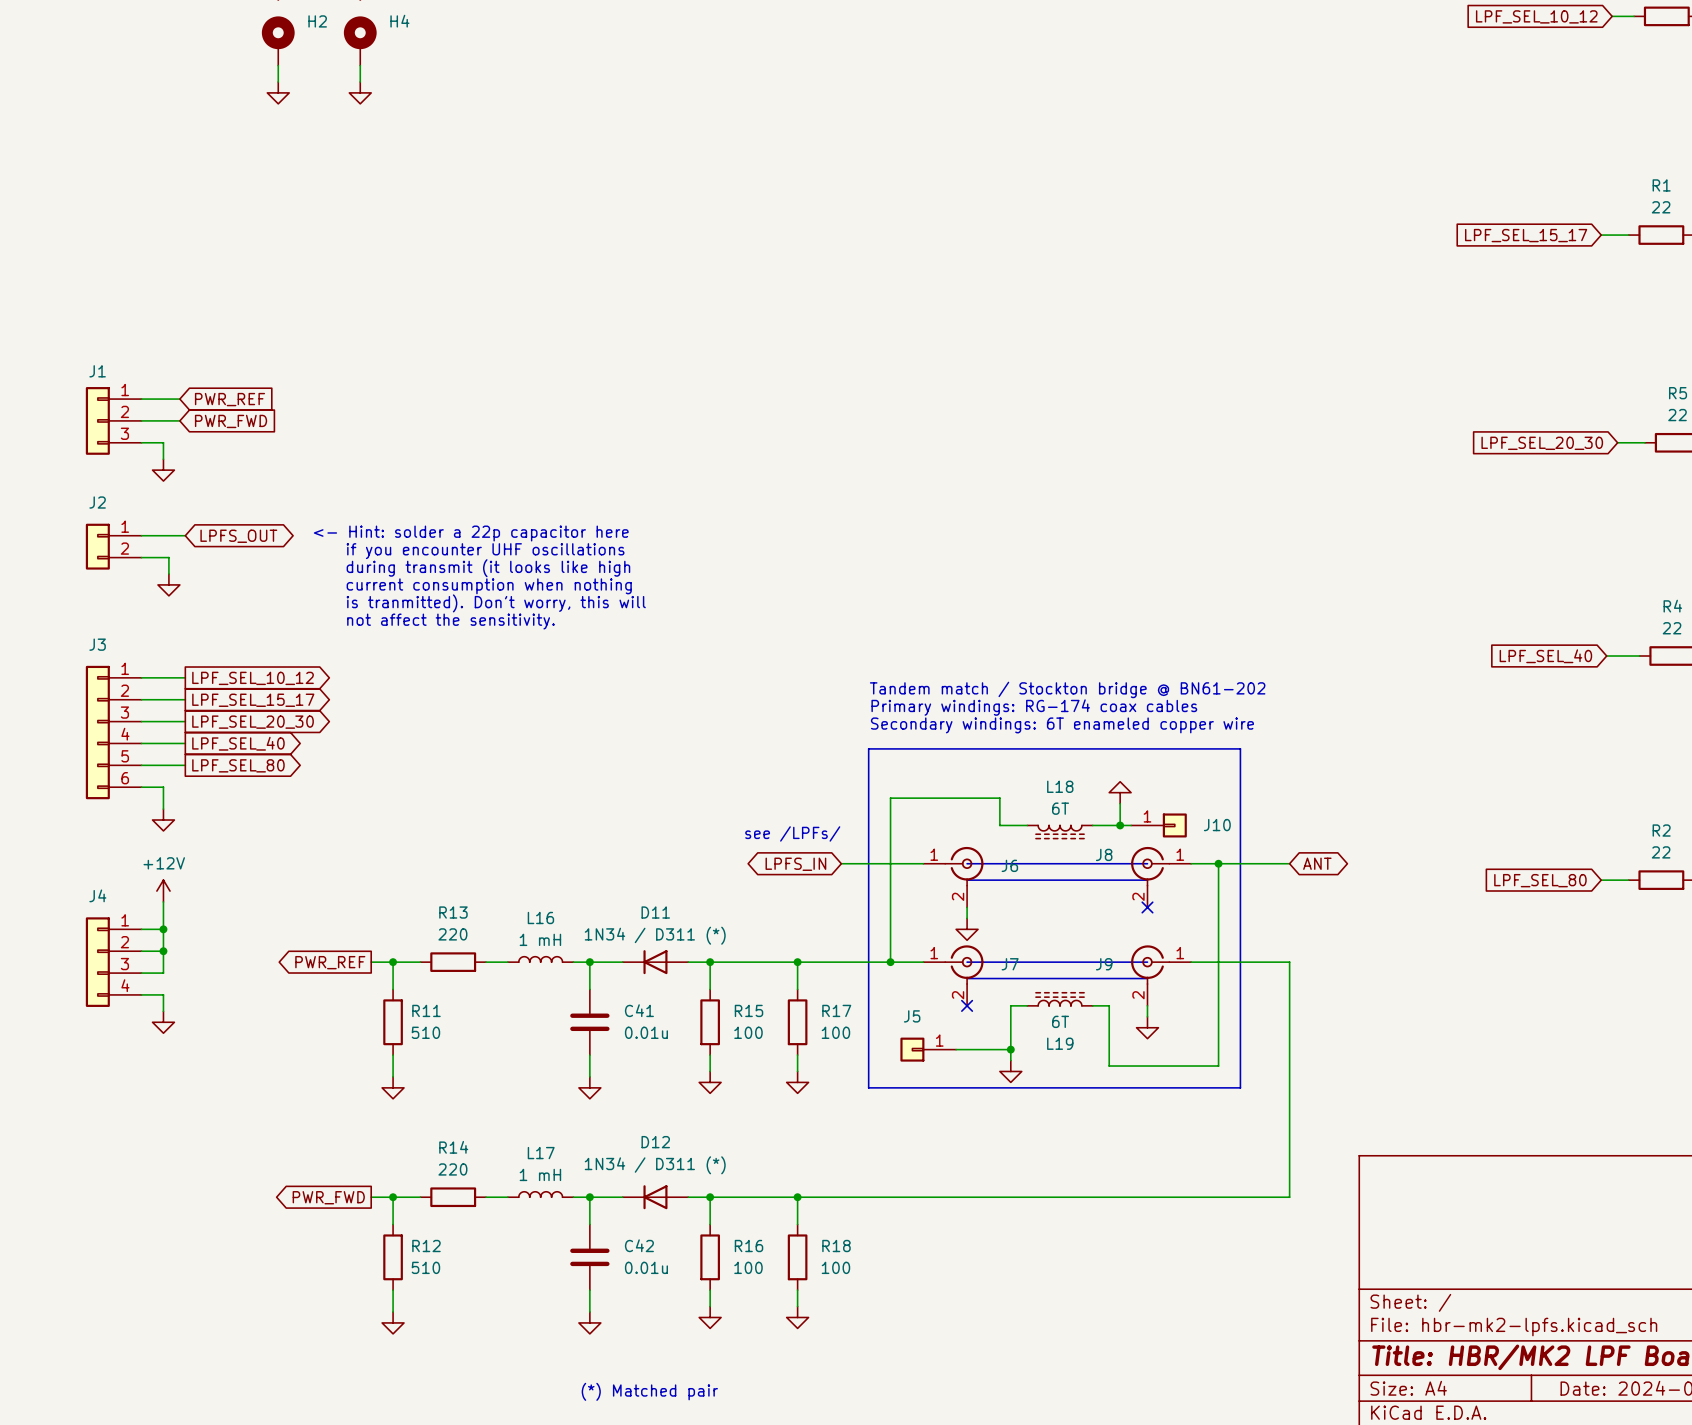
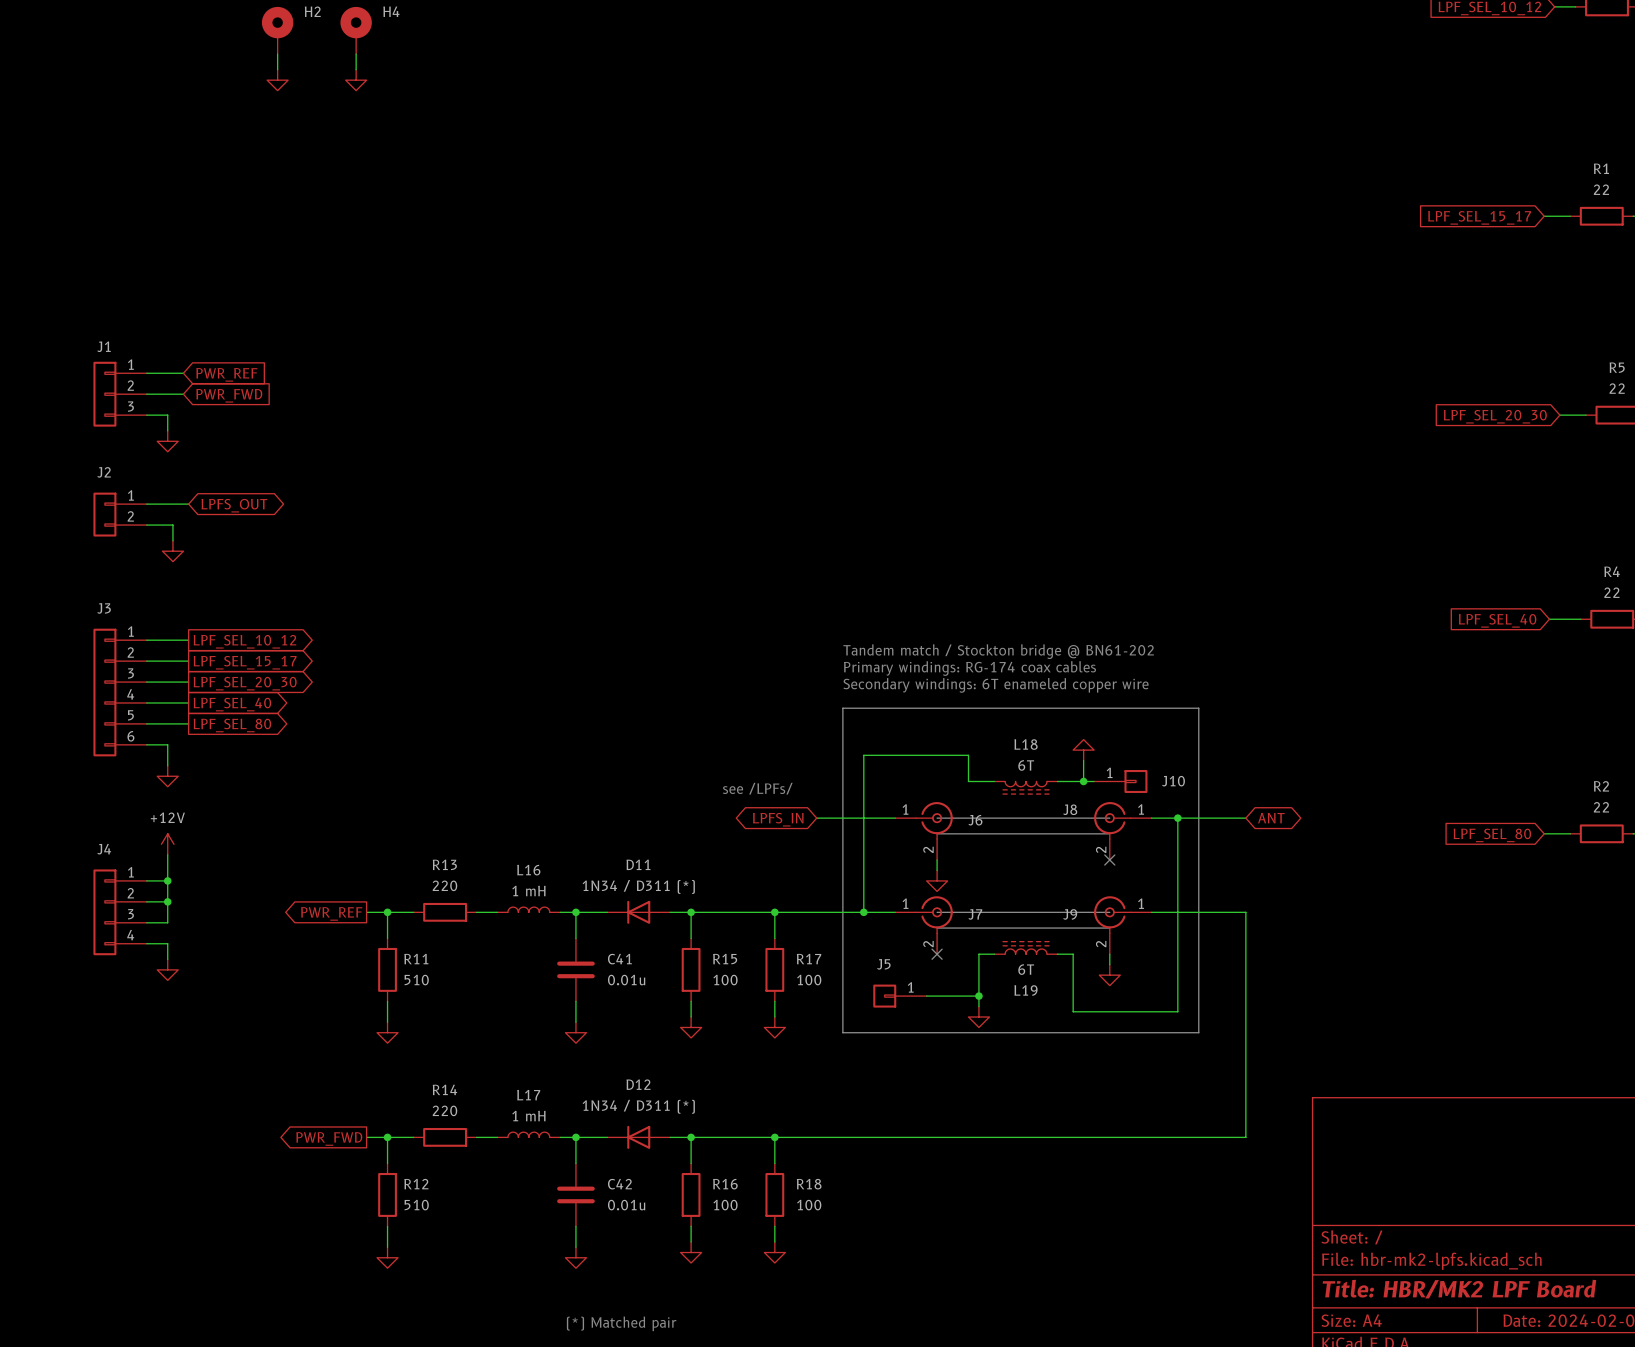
text: <- Hint: solder a 22p capacitor here (471, 533) -> none
text: if you encounter UHF oscillations (485, 551) -> none
text: during transmit (it looks like high (488, 568) -> none
text: current consumption when nothing (489, 586) -> none
text: is tranmitted). Don't worry, this will (496, 603) -> none
text: not affect the sensitivity. (450, 621) -> none

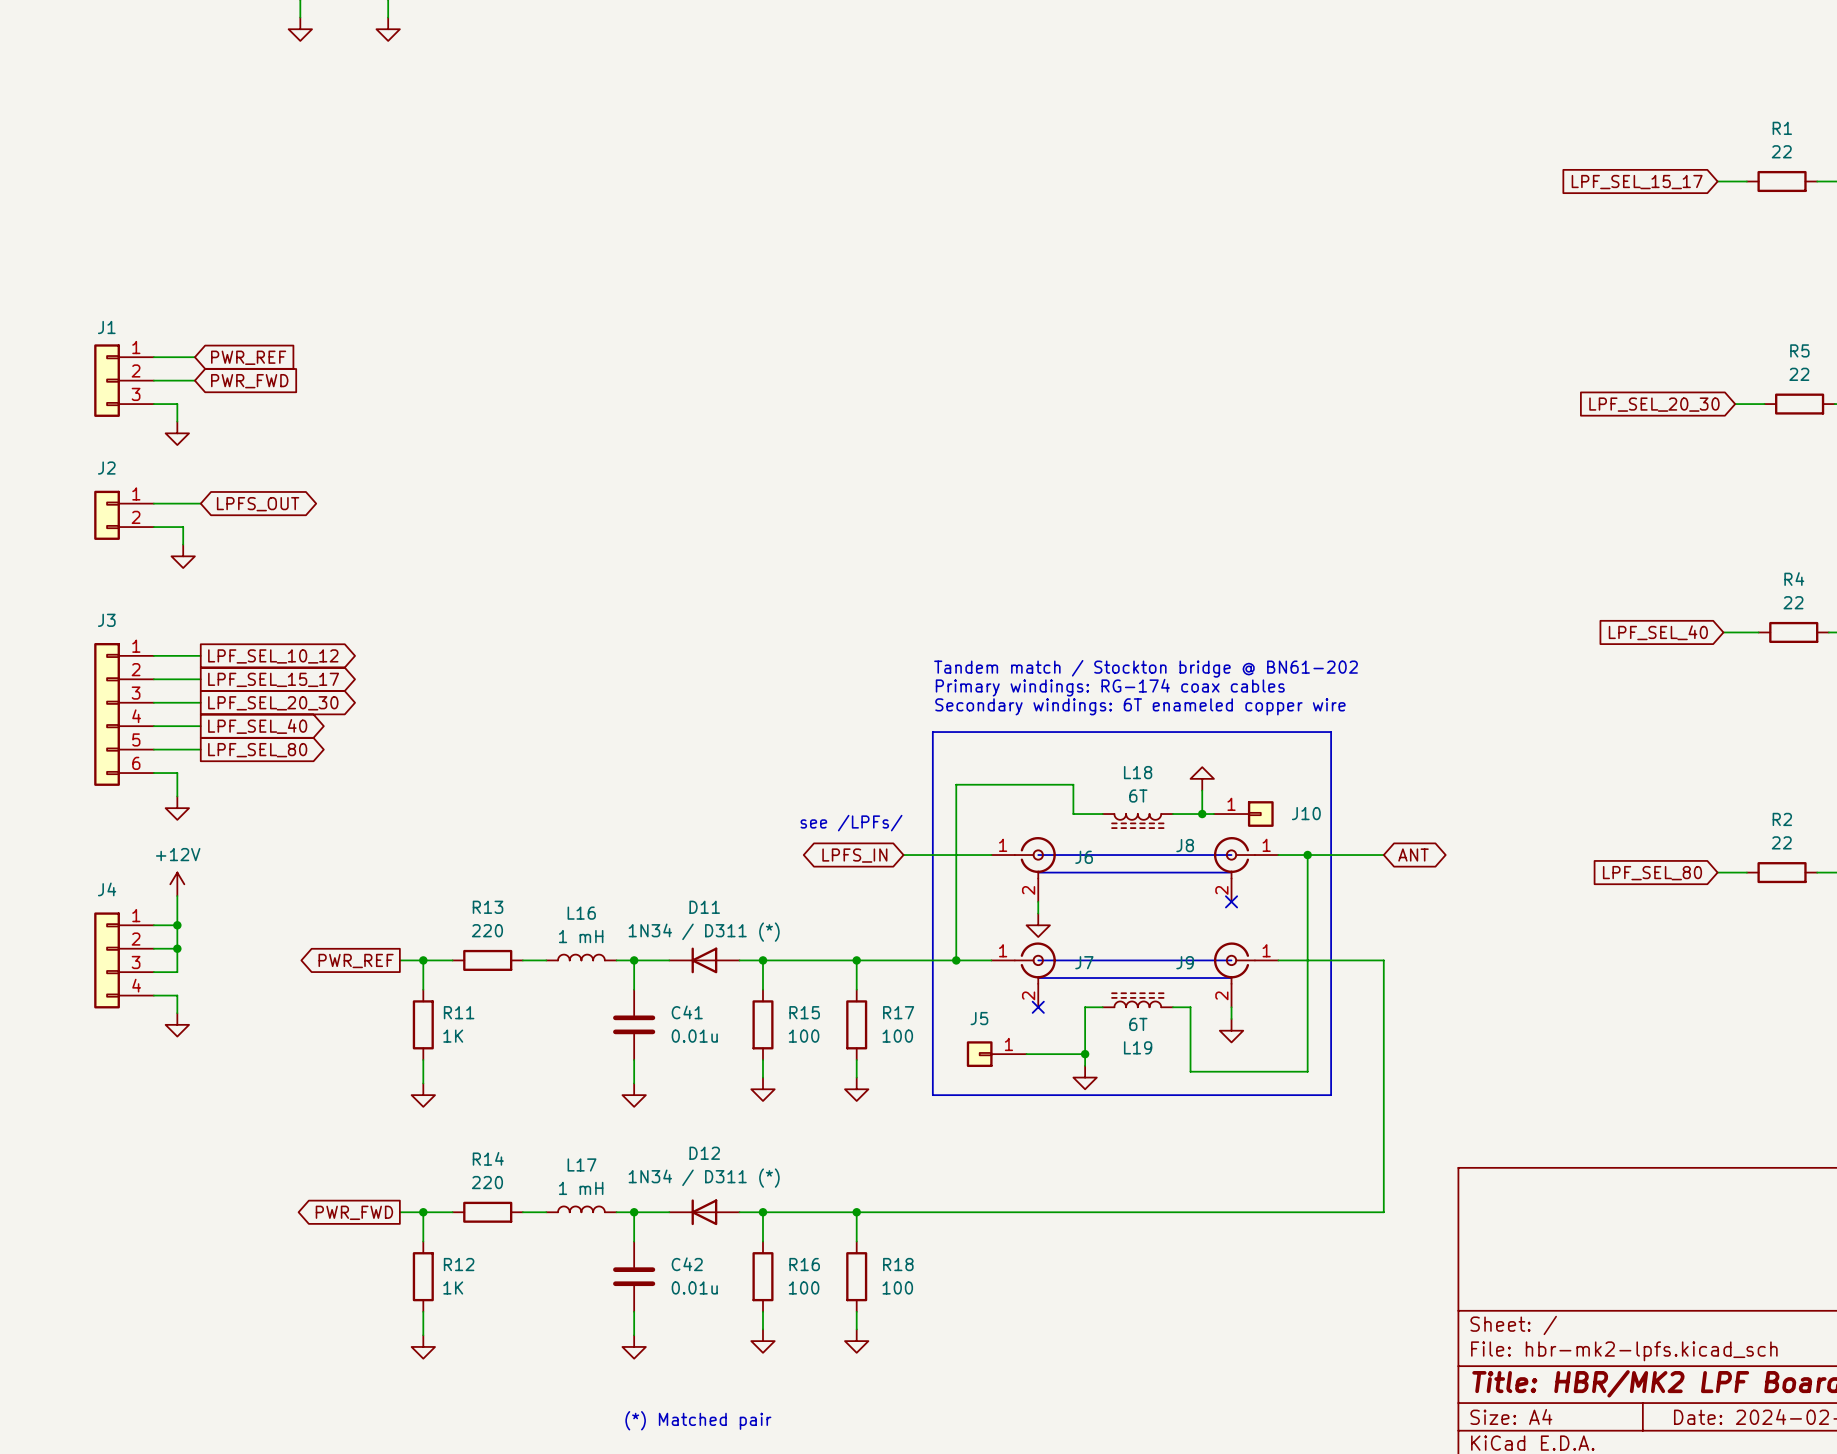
R11 value: 510 (416, 980) -> 1K (453, 1036)
R12 value: 510 (416, 1205) -> 1K (453, 1287)

